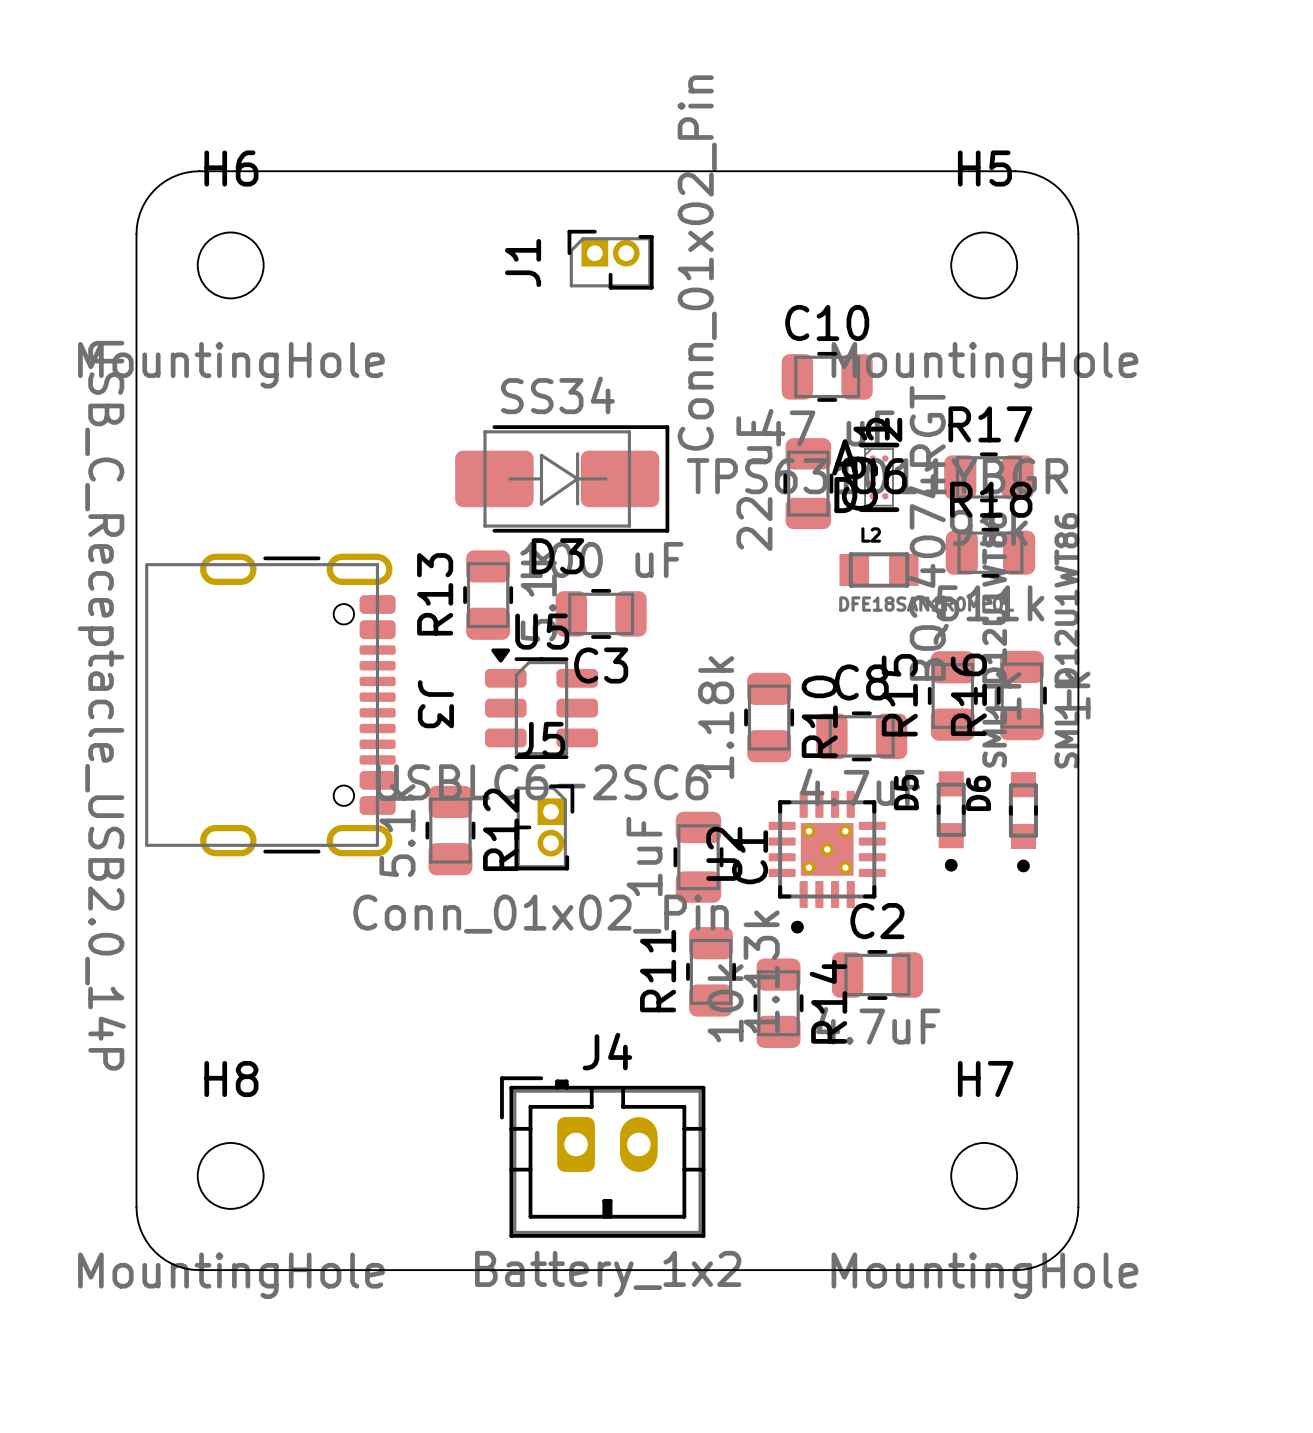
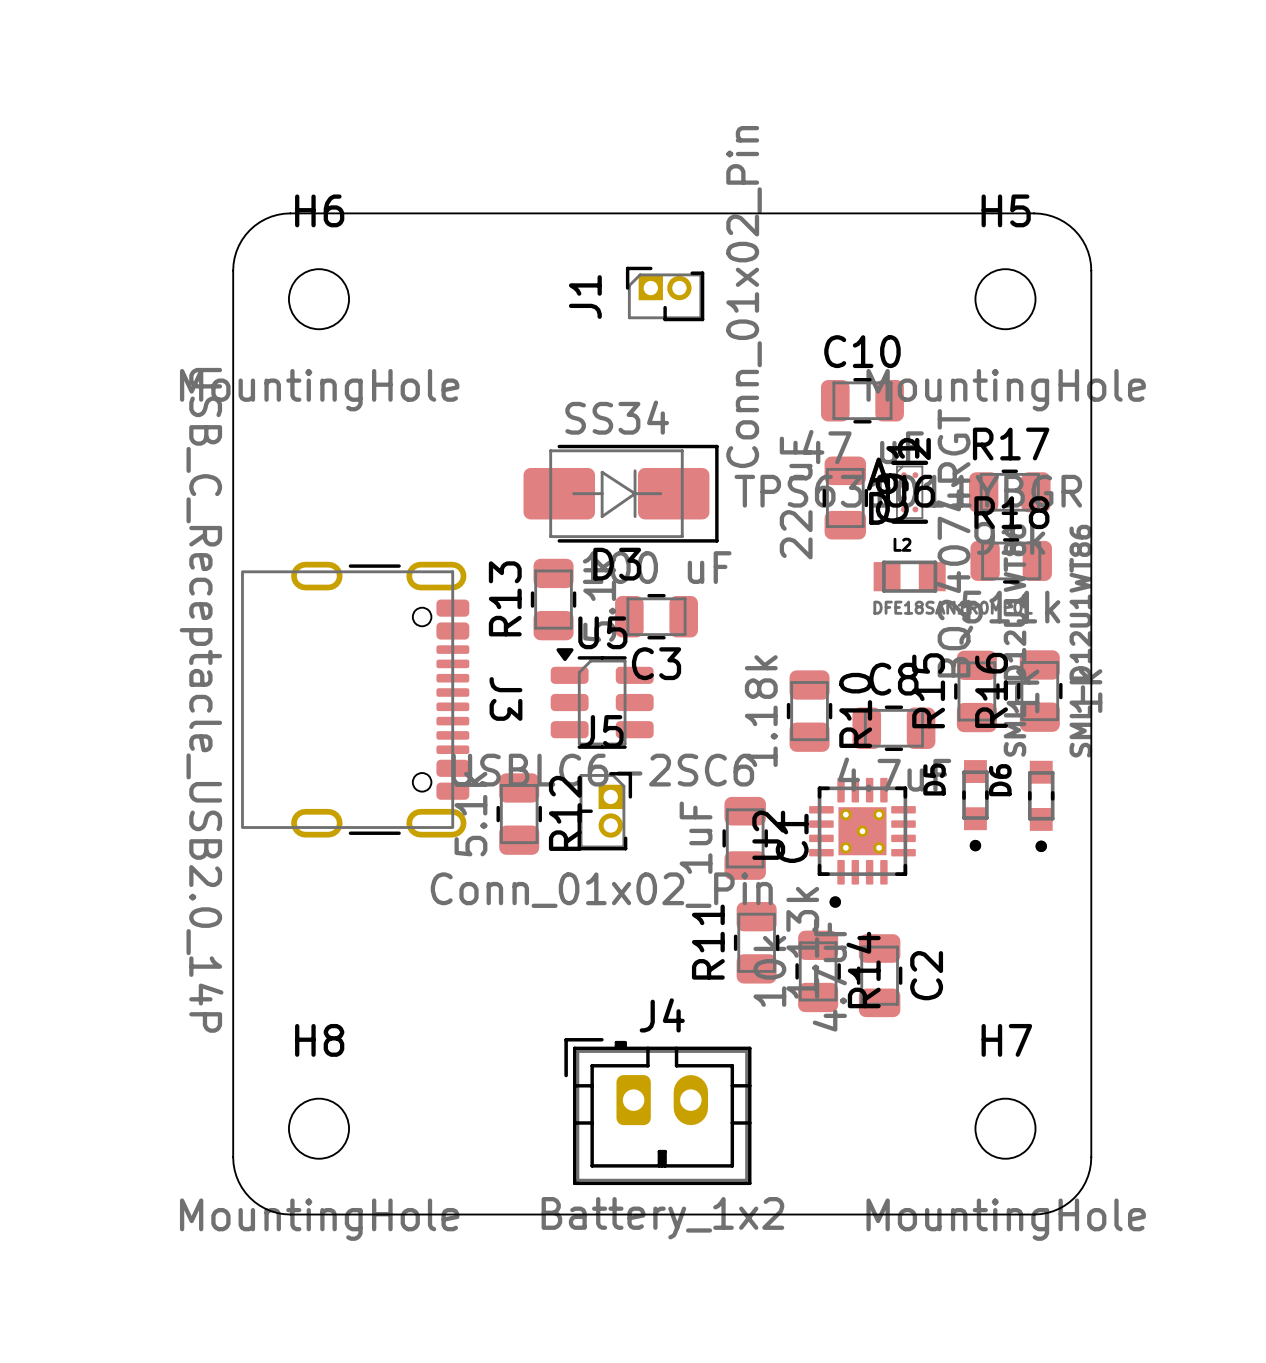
C2 rotation: 0° (877, 974) -> 90° clockwise (879, 975)

